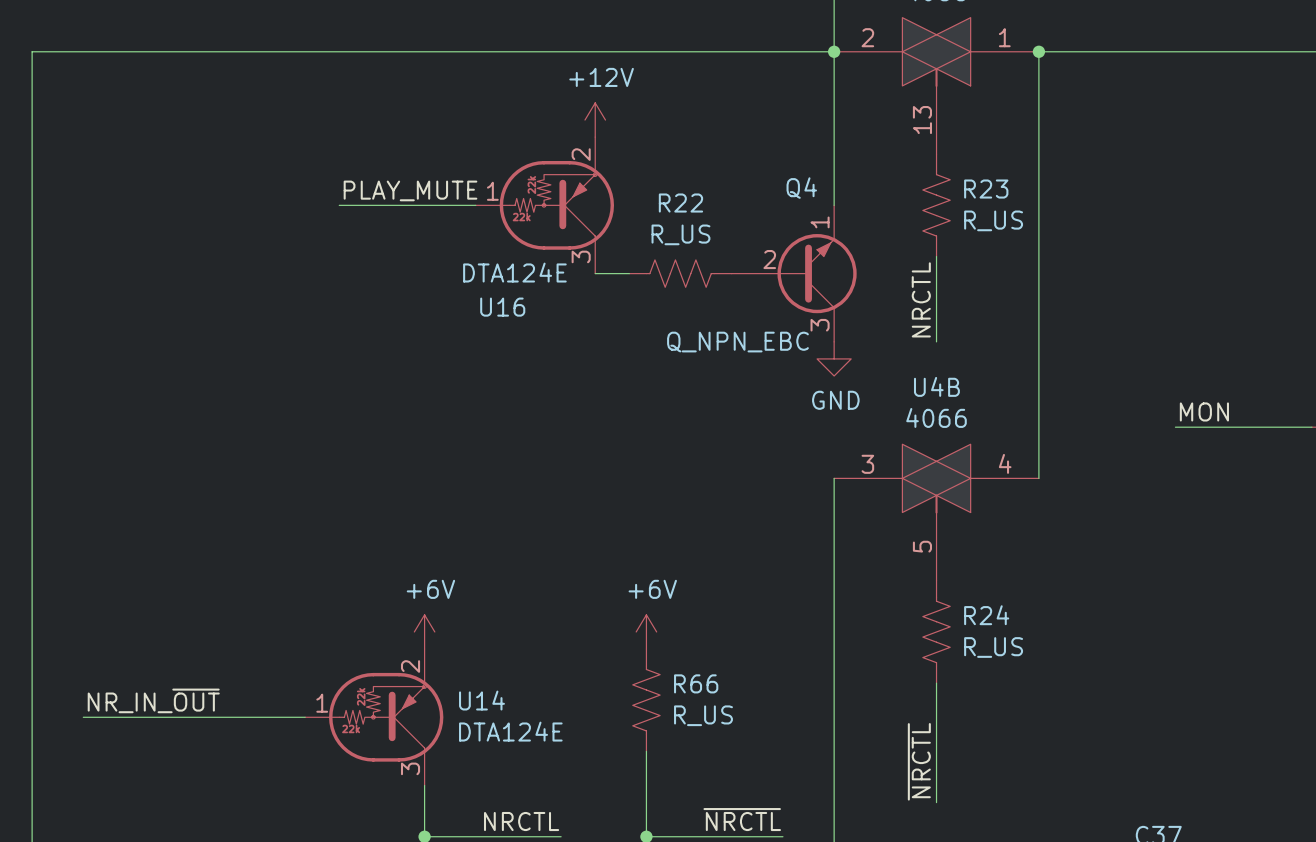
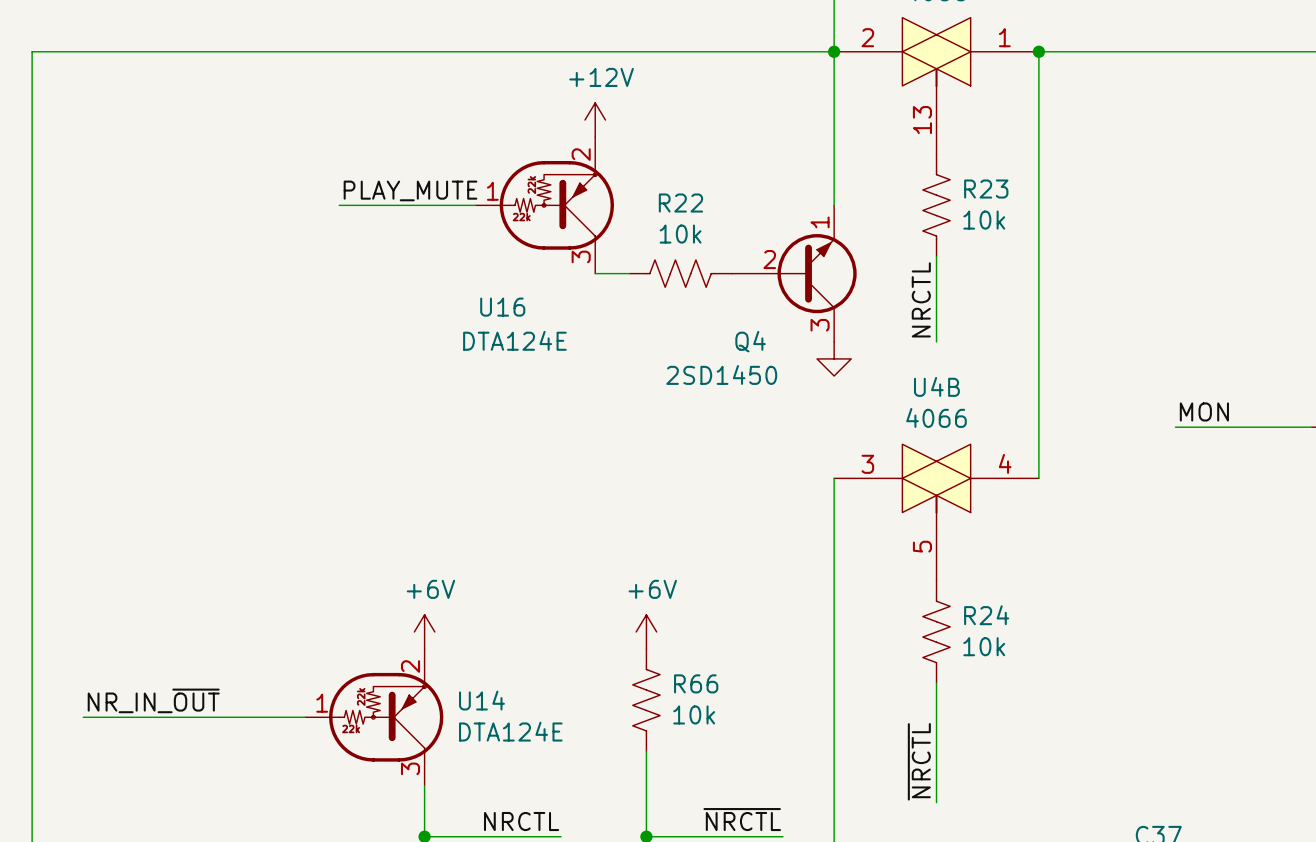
Q4 name position: Q4 (801, 188) -> Q4 (750, 341)
R23 value: R_US (993, 220) -> 10k (984, 220)
R22 value: R_US (680, 234) -> 10k (680, 234)
U16 value position: DTA124E (514, 272) -> DTA124E (514, 340)
Q4 value: Q_NPN_EBC (737, 342) -> 2SD1450 (721, 374)
power symbol text: GND (835, 400) -> none
R24 value: R_US (993, 647) -> 10k (984, 646)
R66 value: R_US (703, 715) -> 10k (694, 714)

